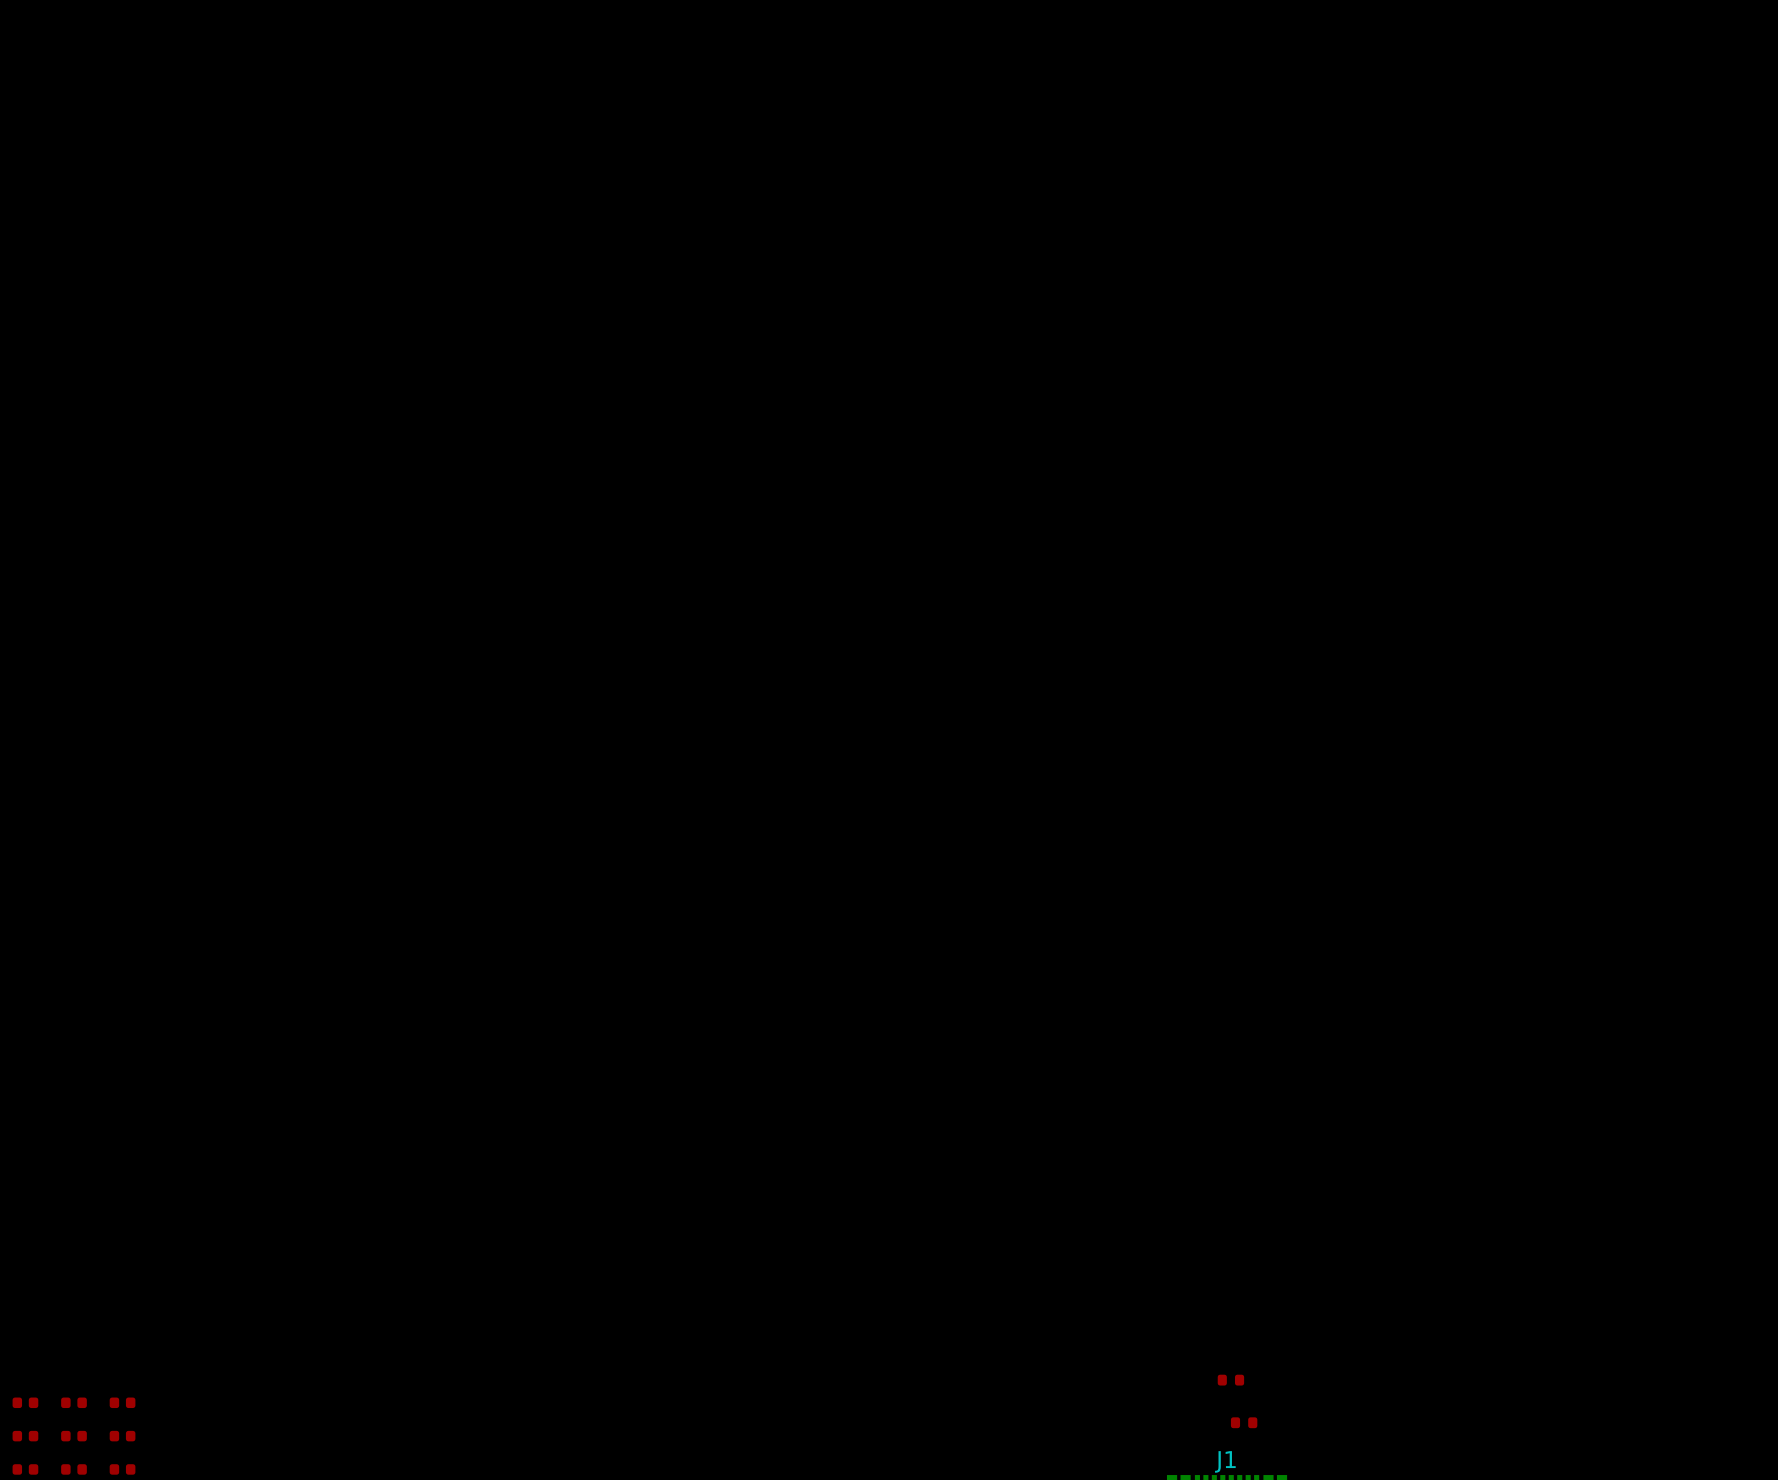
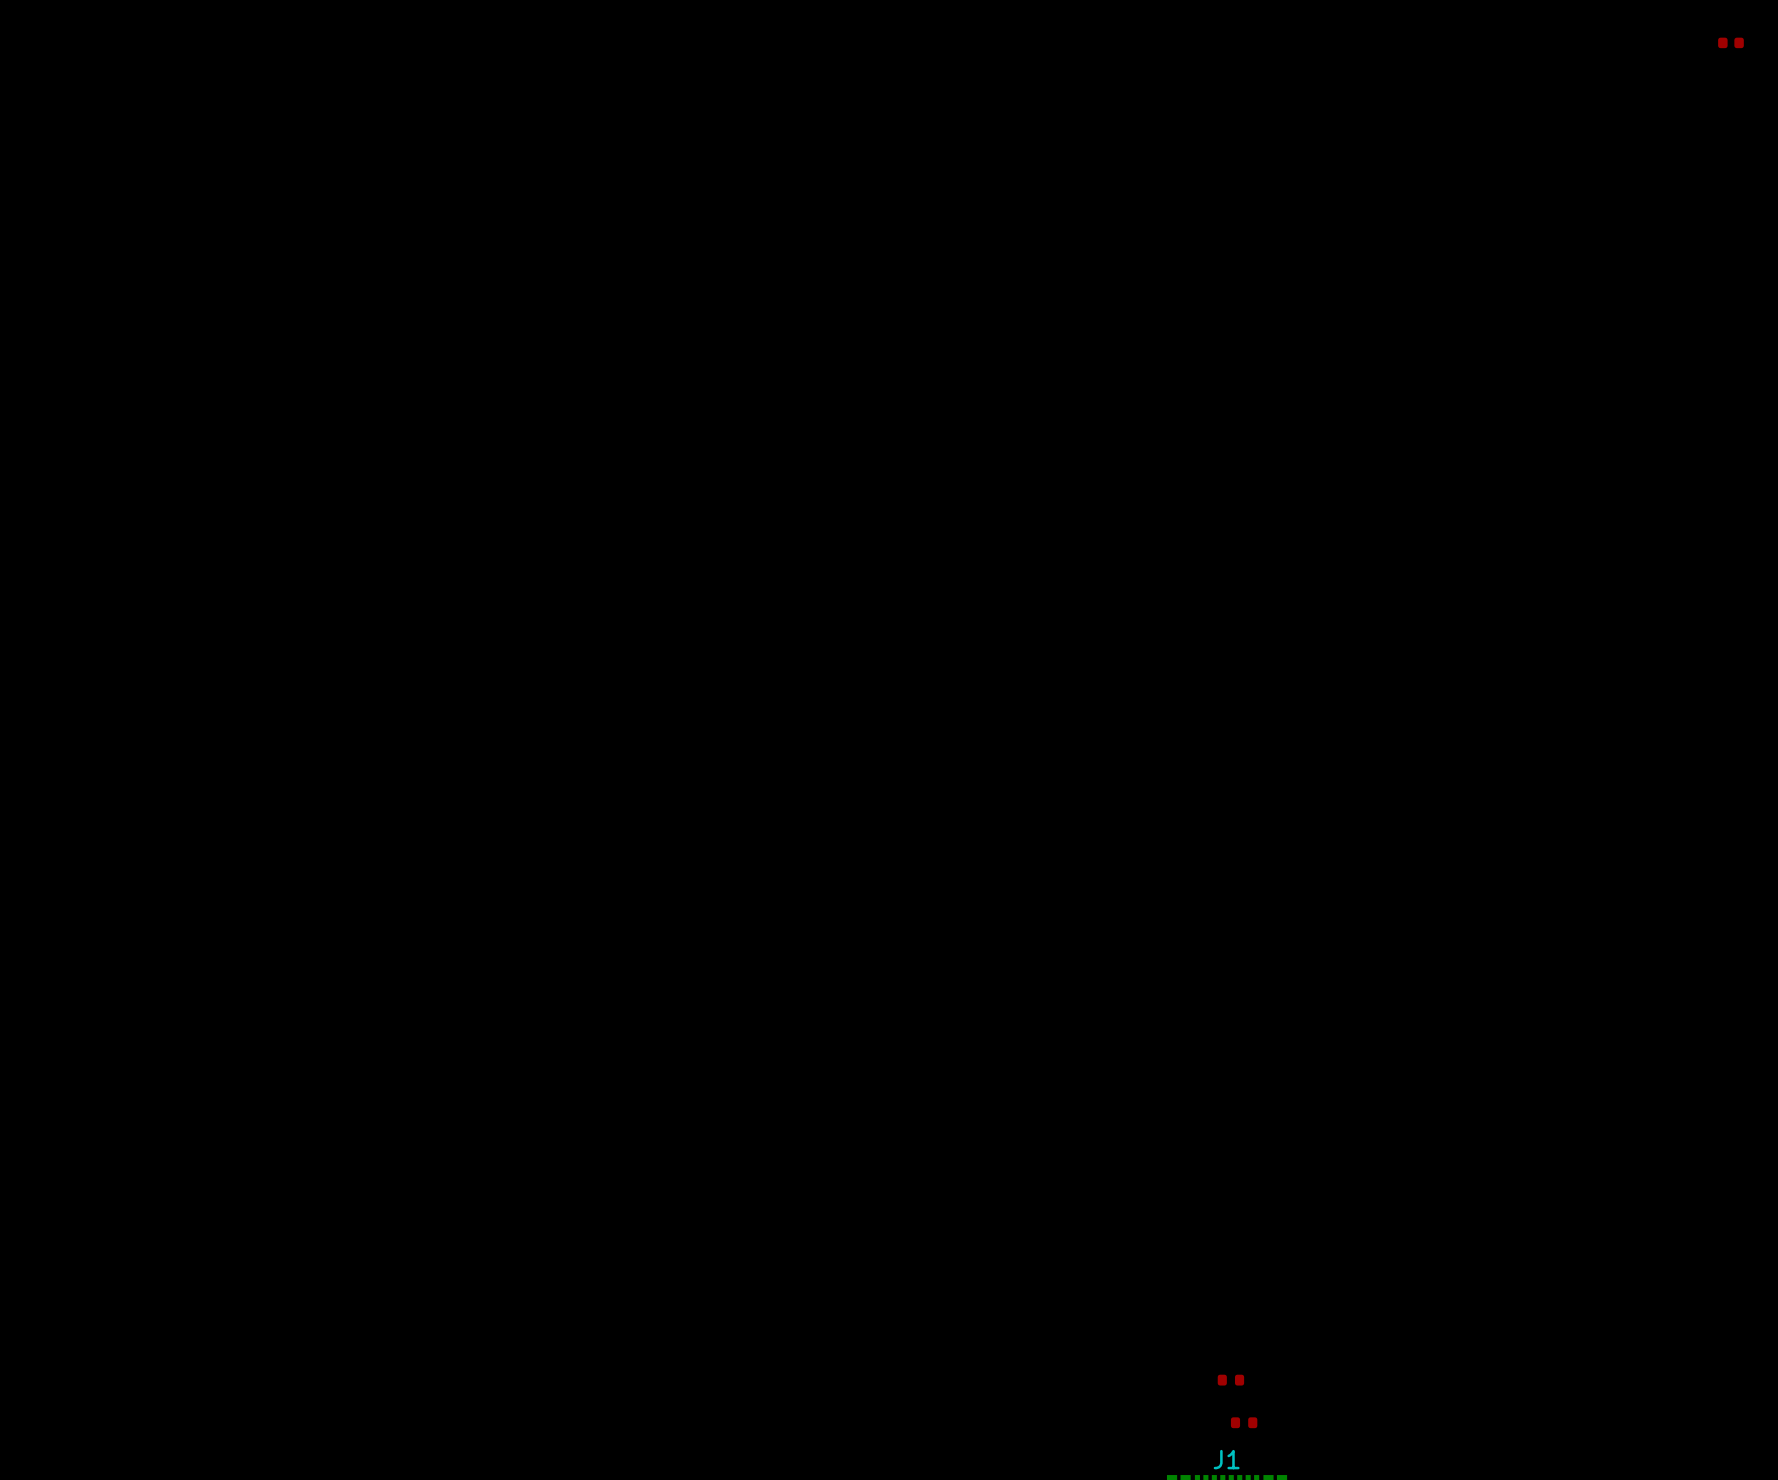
part: none -> (1730, 42)
part: (25, 1402) -> none
part: (73, 1402) -> none
part: (122, 1402) -> none
part: (25, 1436) -> none
part: (73, 1436) -> none
part: (122, 1436) -> none
part: (25, 1469) -> none
part: (73, 1469) -> none
part: (122, 1469) -> none

